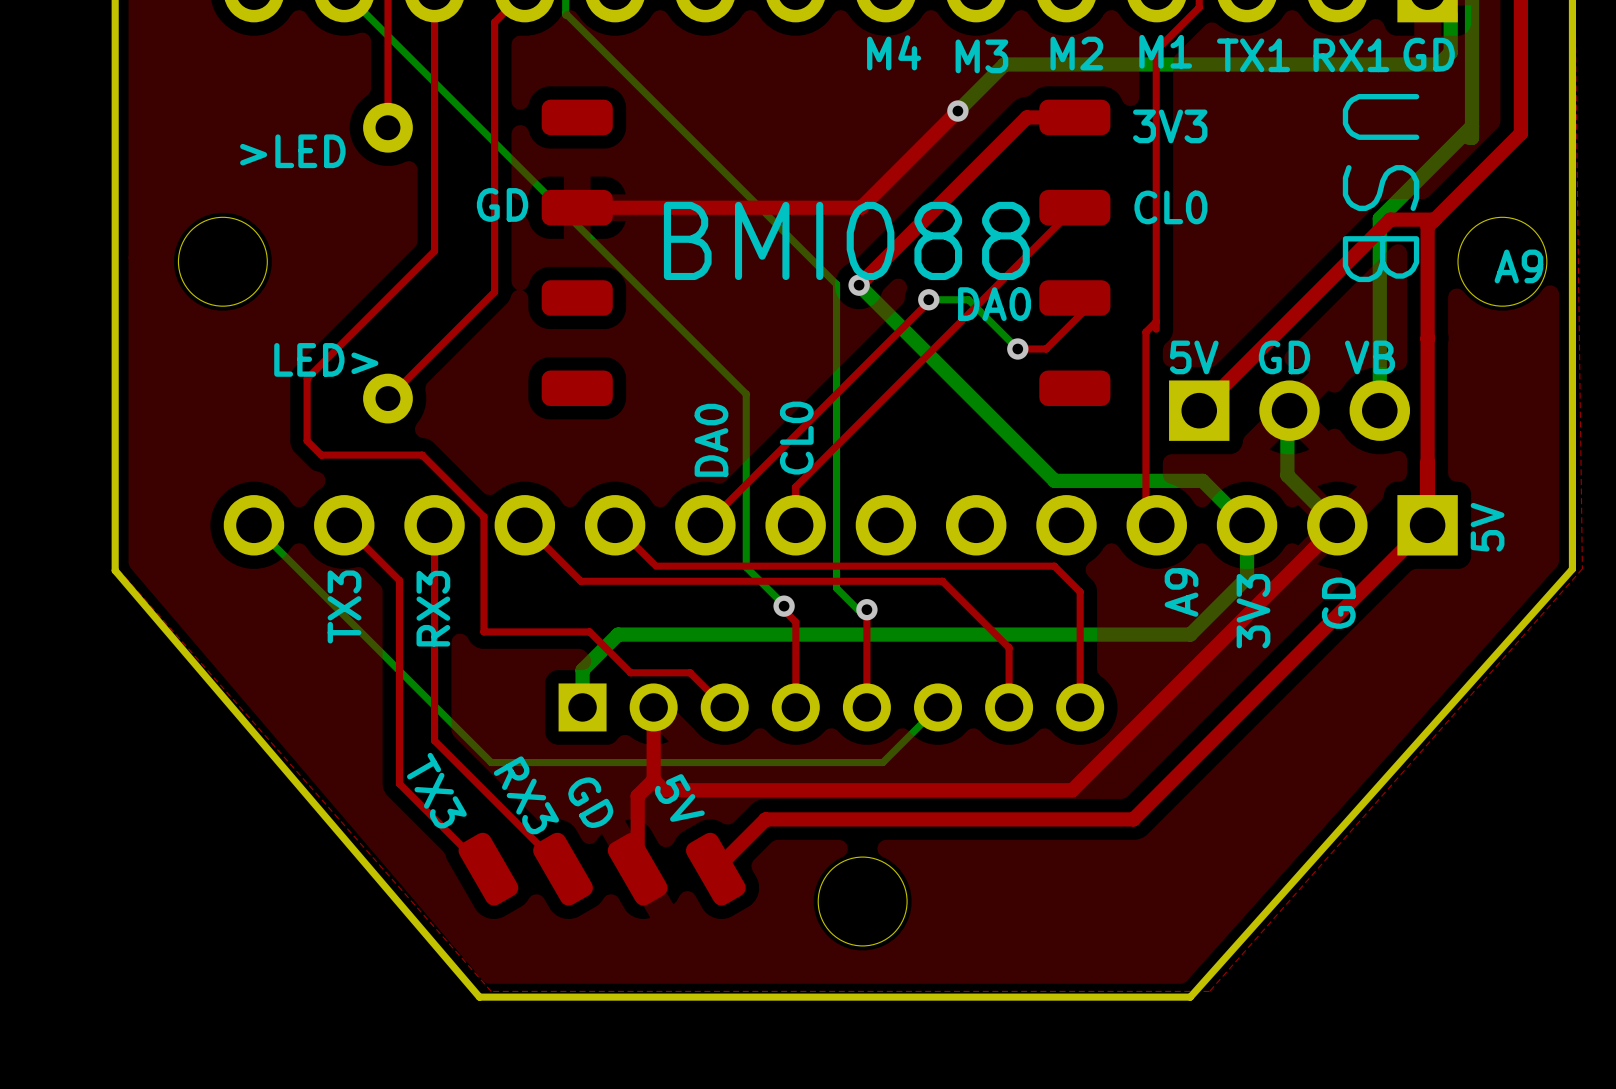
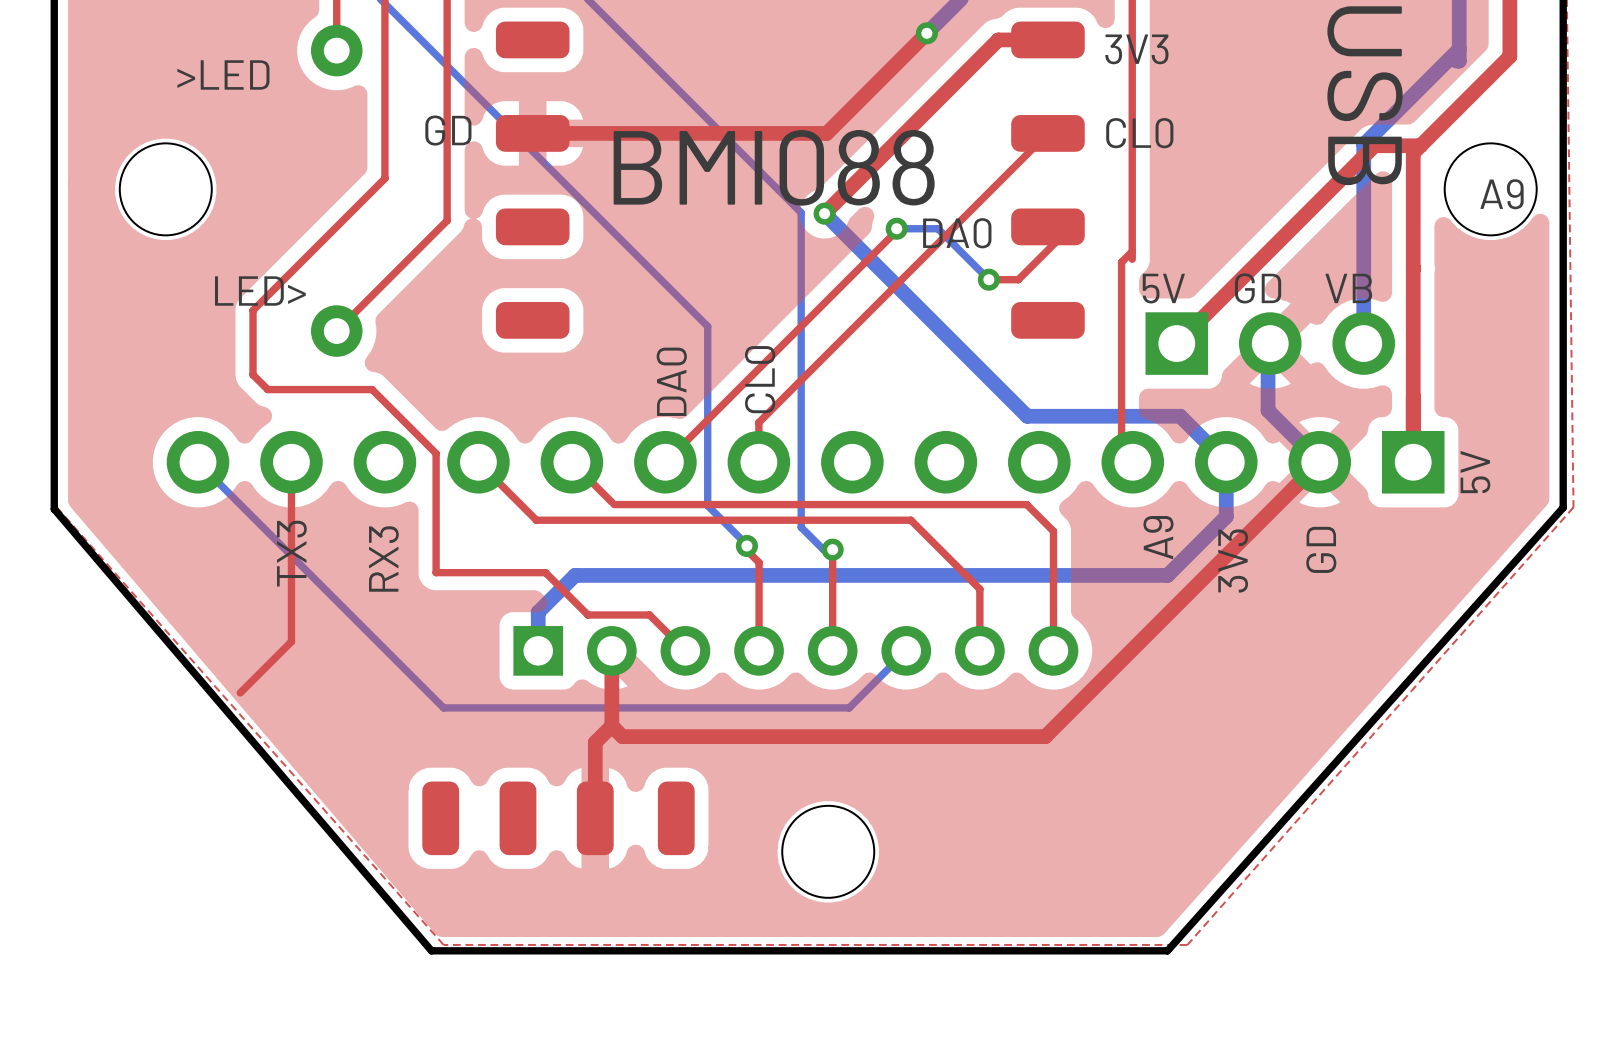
top track: (344, 525) (399, 580) (399, 783) (484, 869) (488, 869) -> (291, 462) (291, 641) (240, 692)
top track: (434, 525) (434, 740) (563, 869) -> none
top track: (1427, 525) (1133, 819) (765, 819) (715, 869) -> none
text: TX3 (436, 790) -> none
text: RX3 (526, 795) -> none
text: 5V (679, 797) -> none
text: GD (590, 802) -> none
part rotation: 0° (488, 869) -> 30° clockwise (440, 818)
part rotation: 0° (563, 869) -> 30° clockwise (517, 818)
part rotation: 0° (637, 869) -> 30° clockwise (595, 818)
part rotation: 0° (715, 869) -> 30° clockwise (676, 818)

